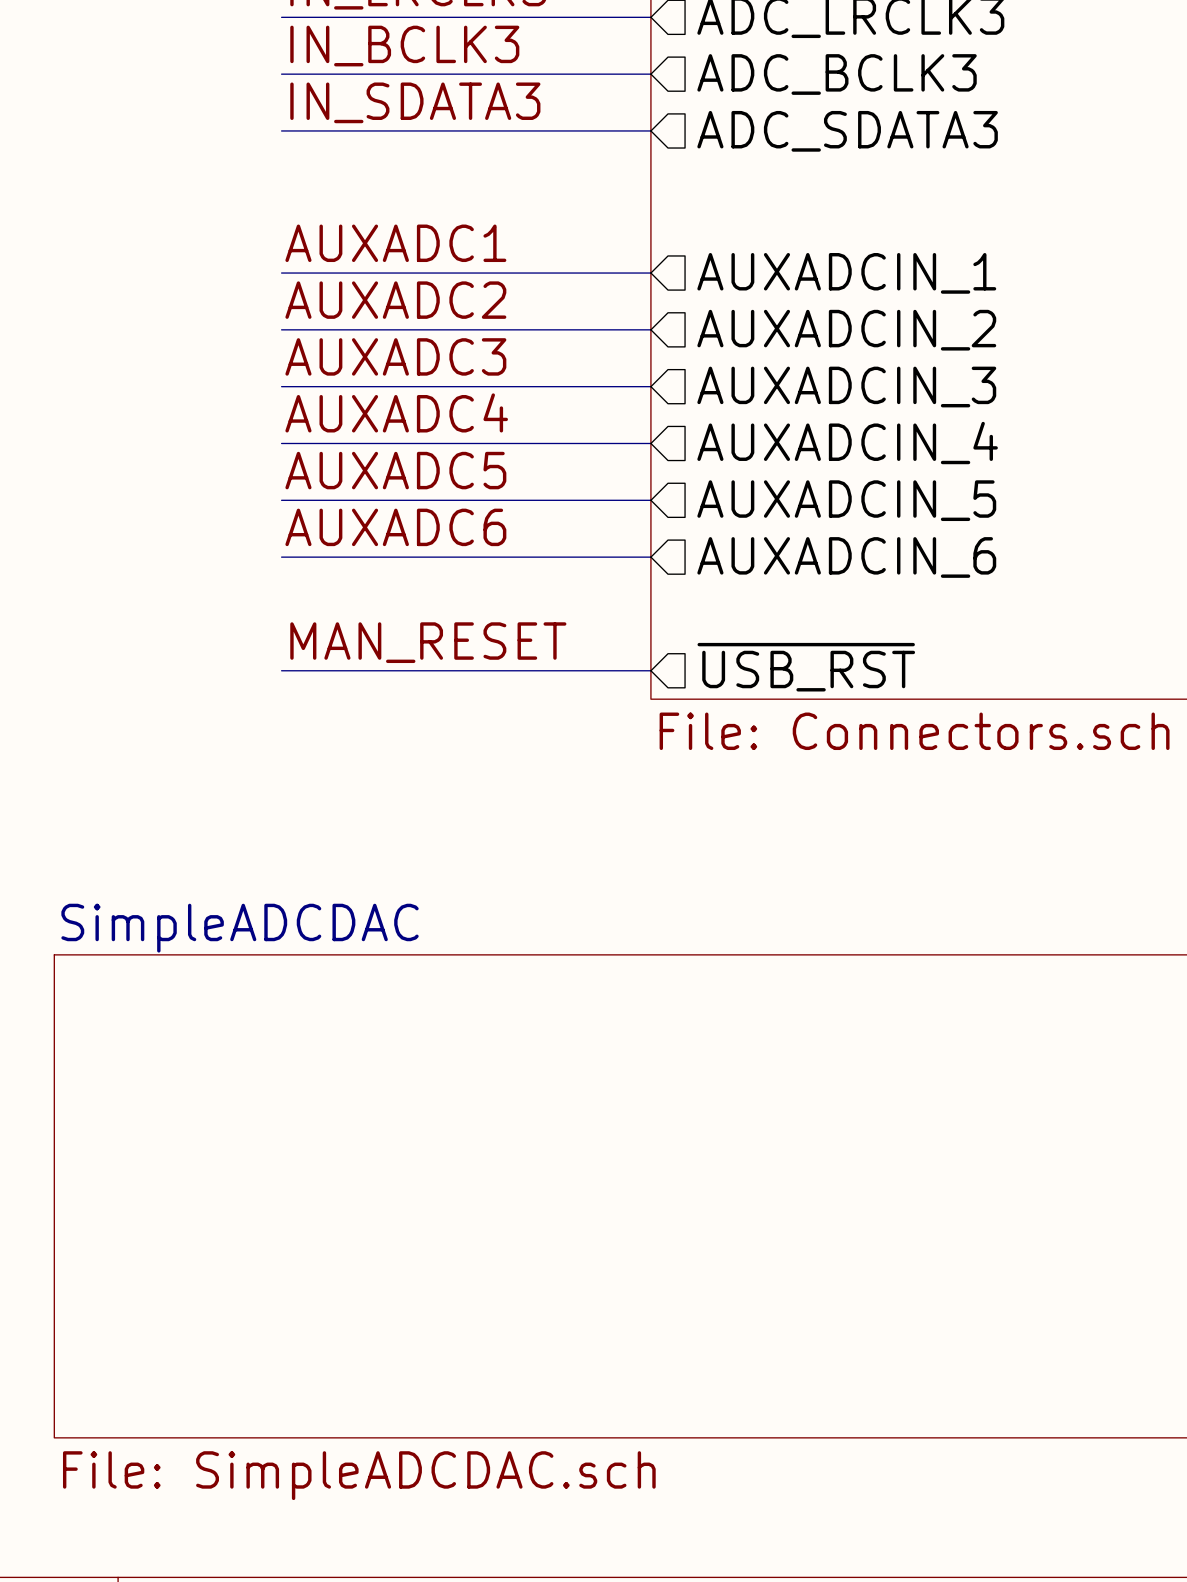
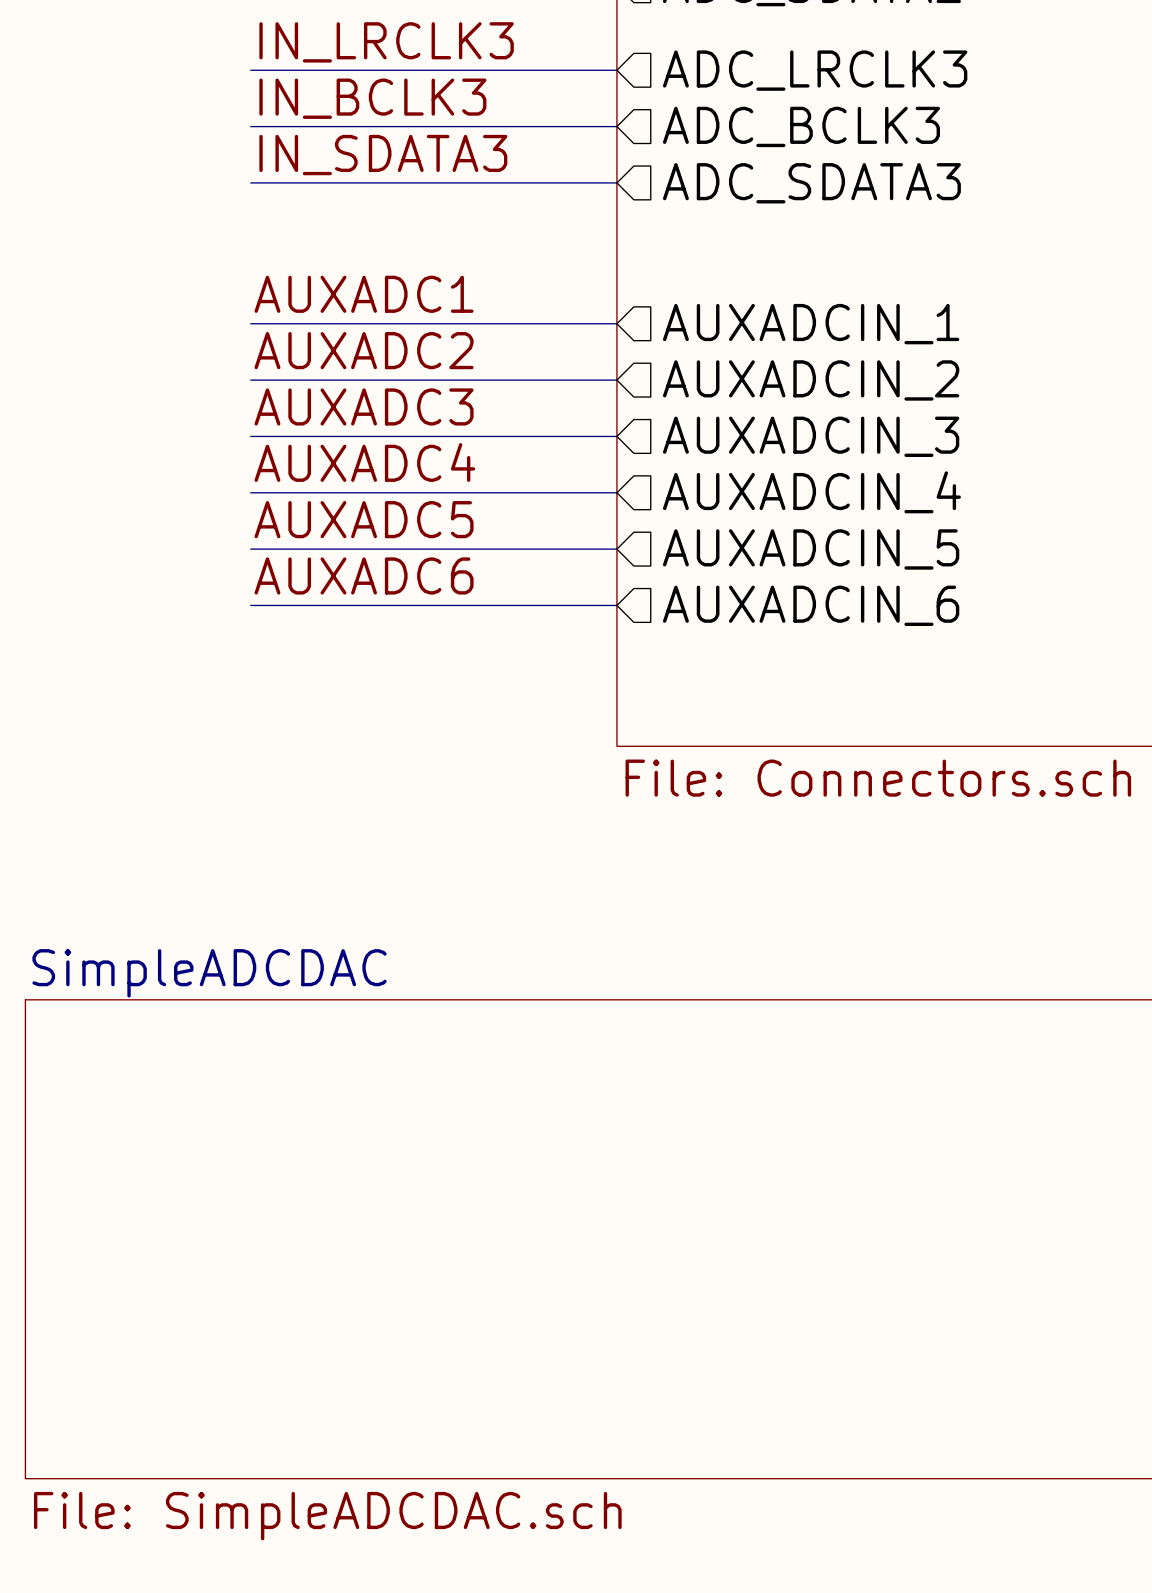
label: MAN_RESET (428, 642) -> none
sheet pin: ~{USB_RST} (806, 667) -> none
wire: (281, 670) (650, 670) -> none

